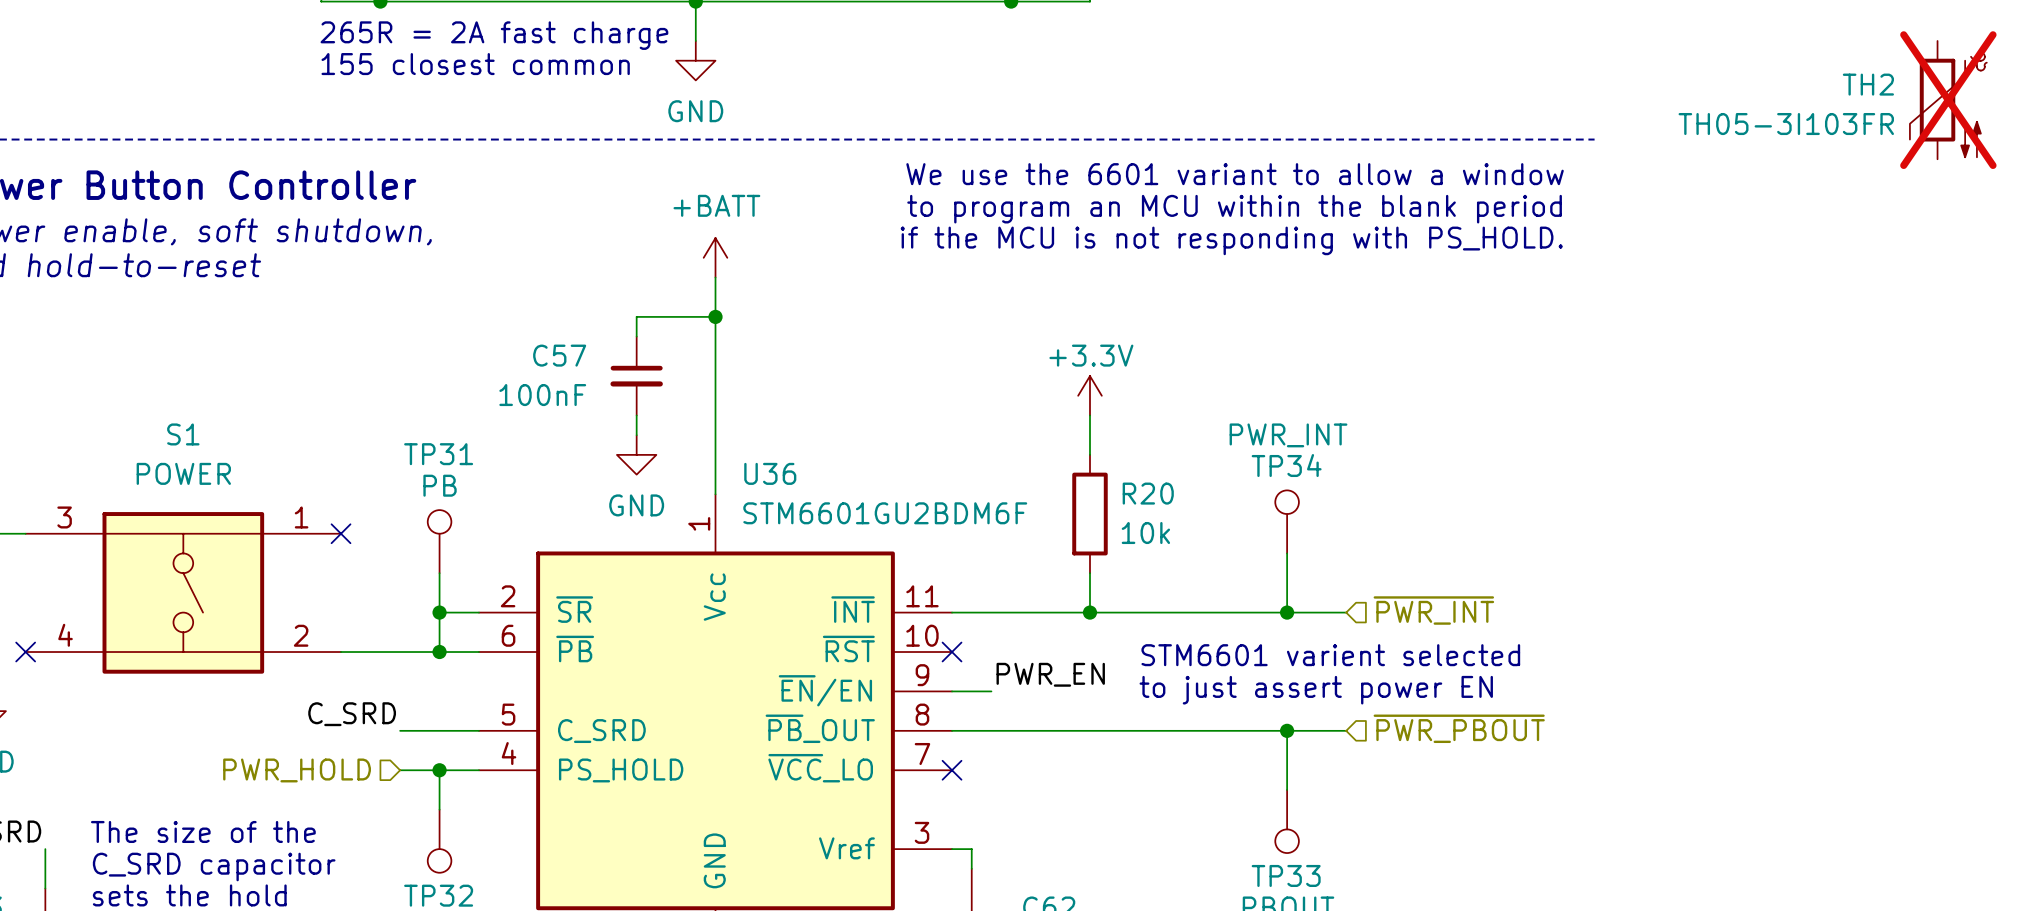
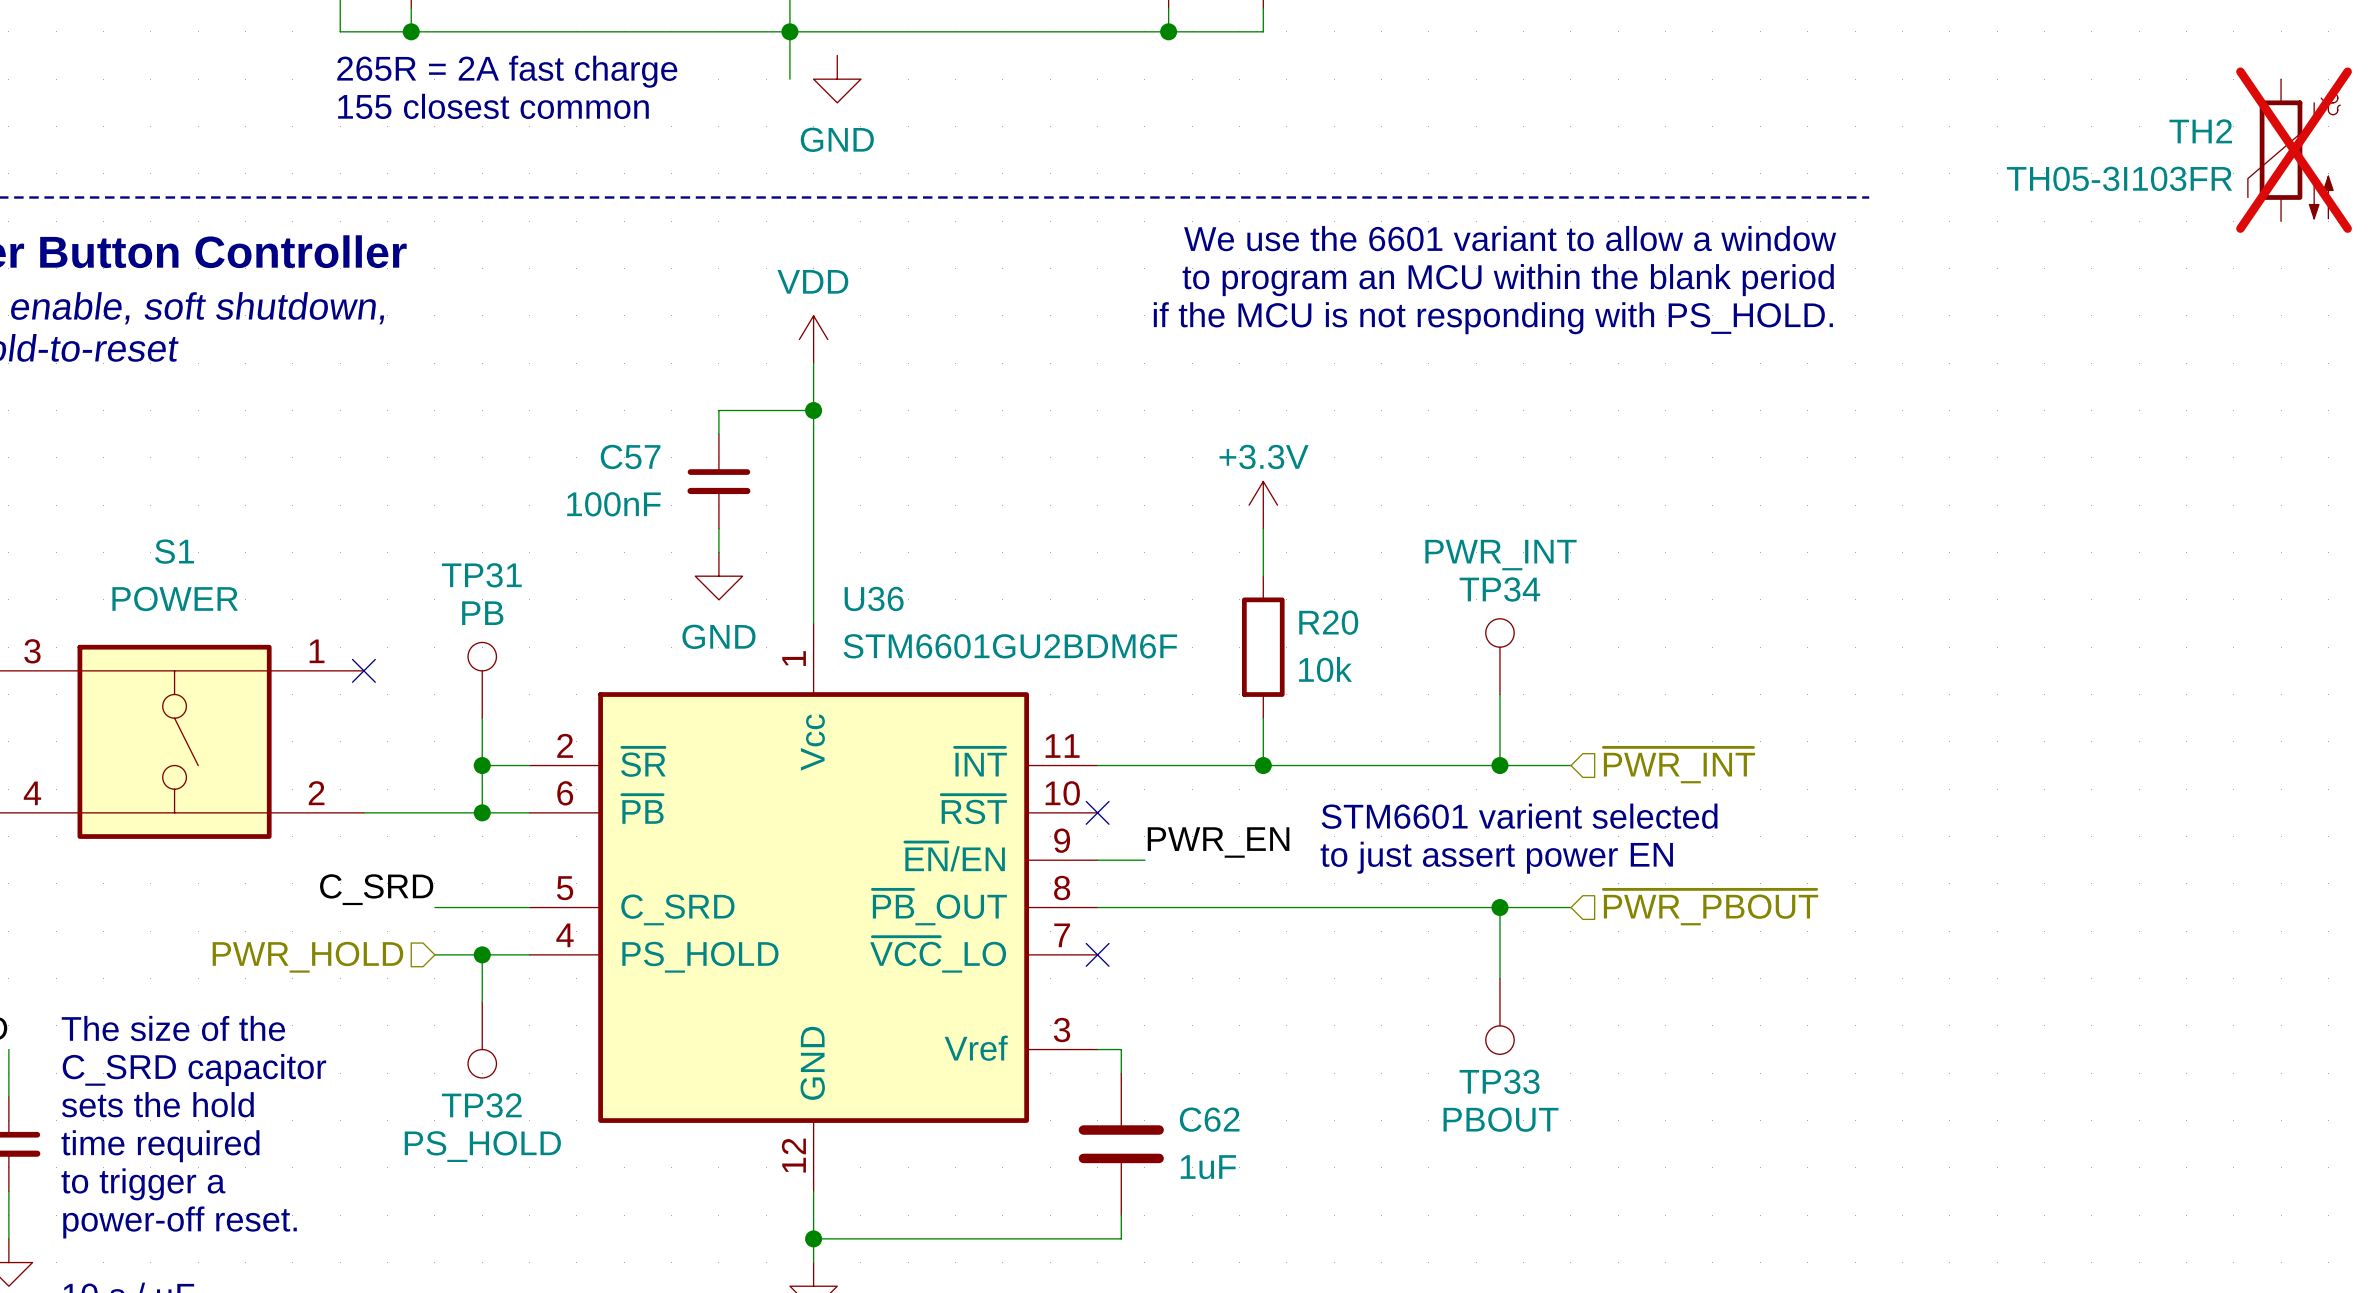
power symbol position: GND (695, 60) -> GND (837, 79)
power symbol: +BATT (715, 257) -> VDD (813, 339)

